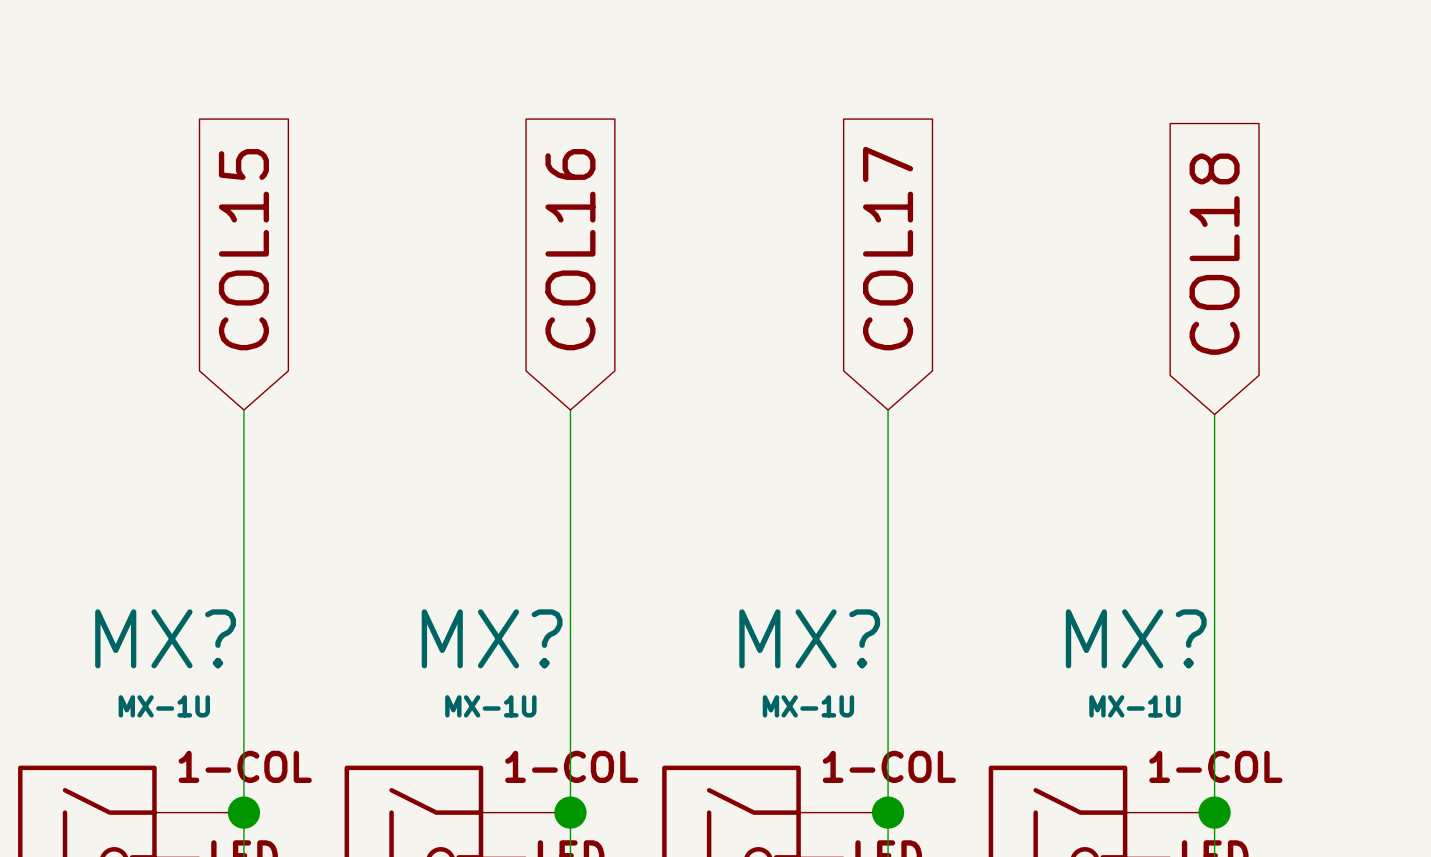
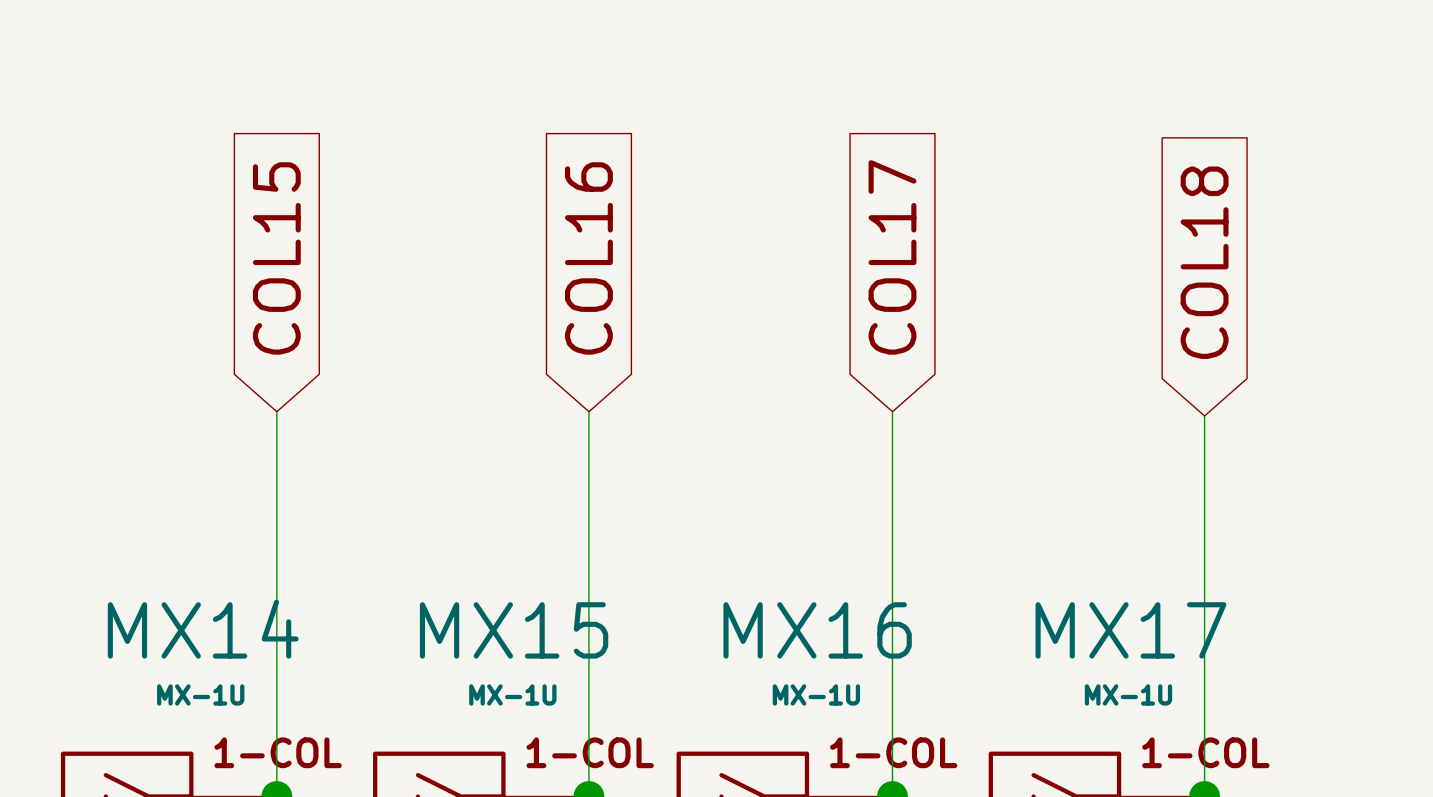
MX? name: MX? (165, 638) -> MX14 (203, 629)
MX? name: MX? (492, 638) -> MX15 (514, 630)
MX? name: MX? (809, 638) -> MX16 (817, 630)
MX? name: MX? (1136, 638) -> MX17 (1130, 630)

